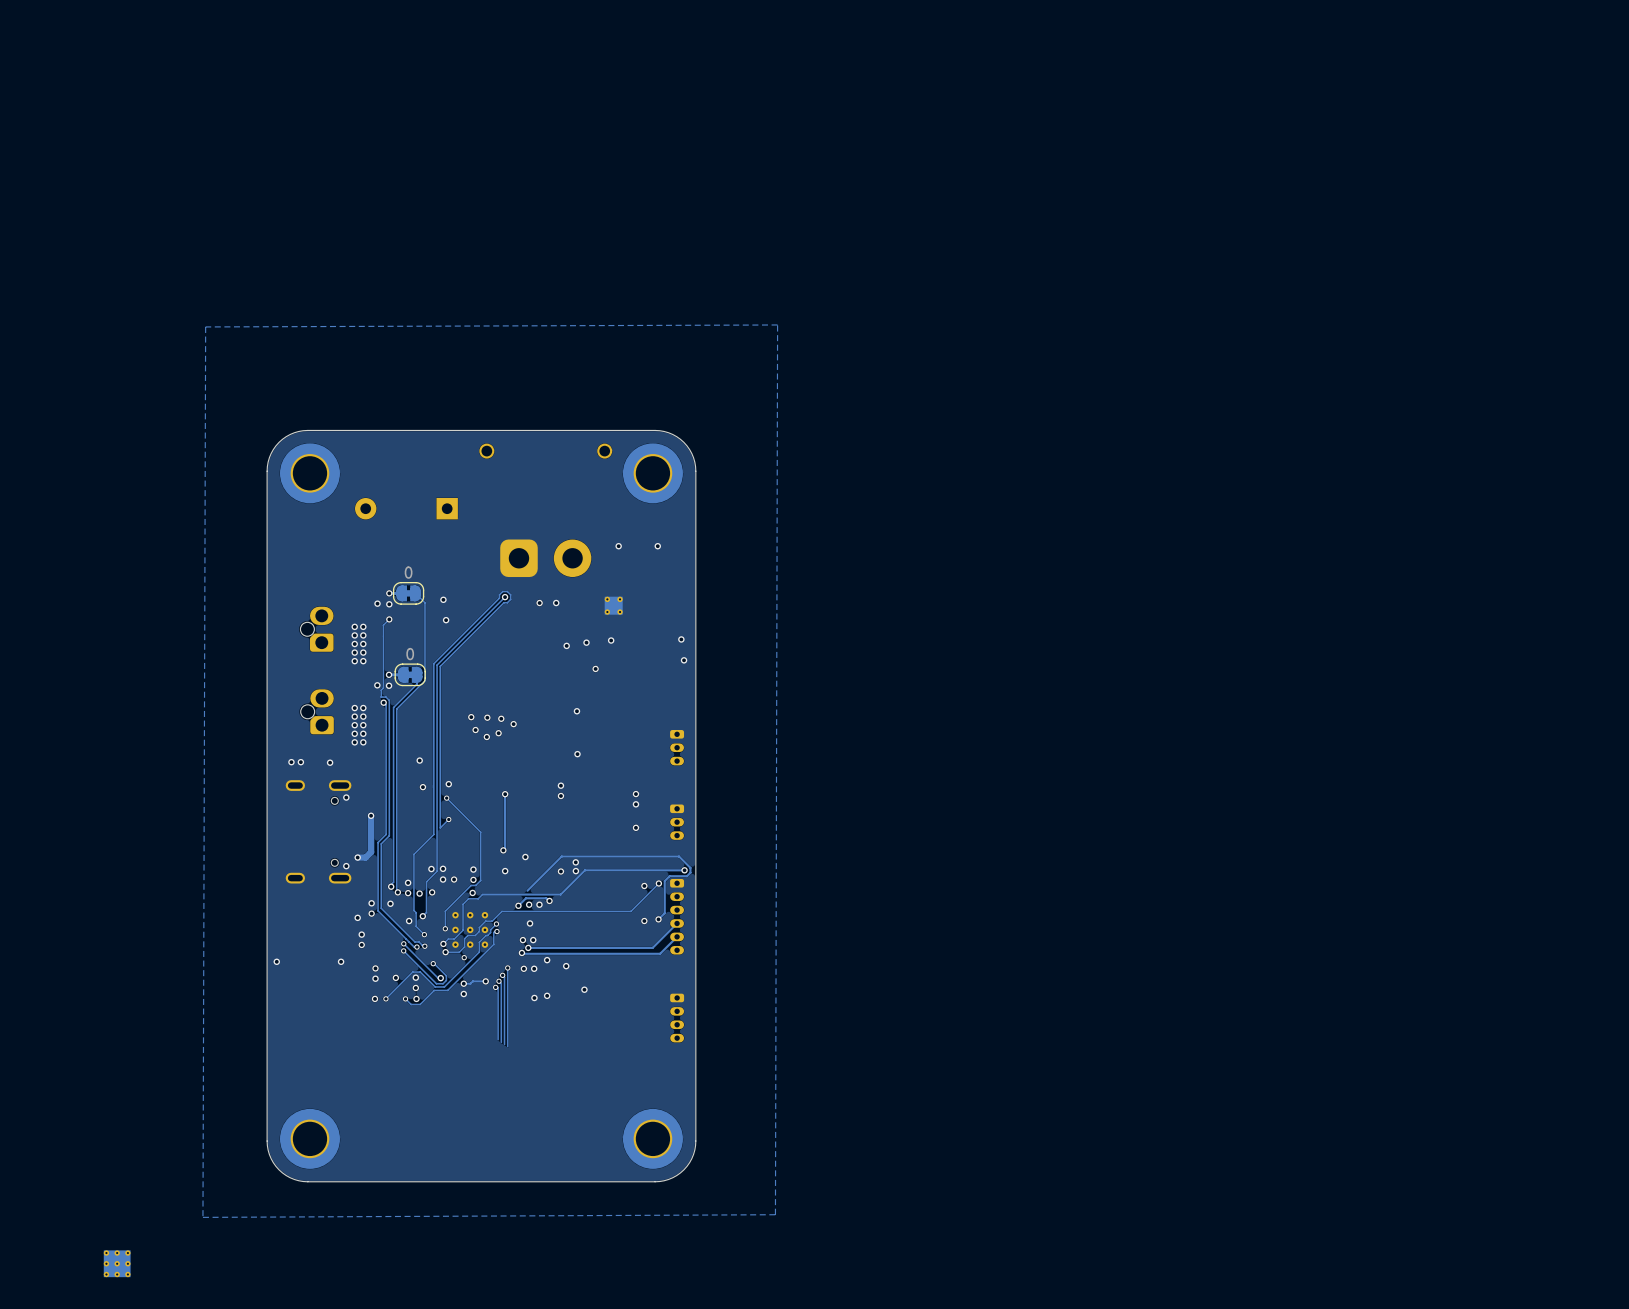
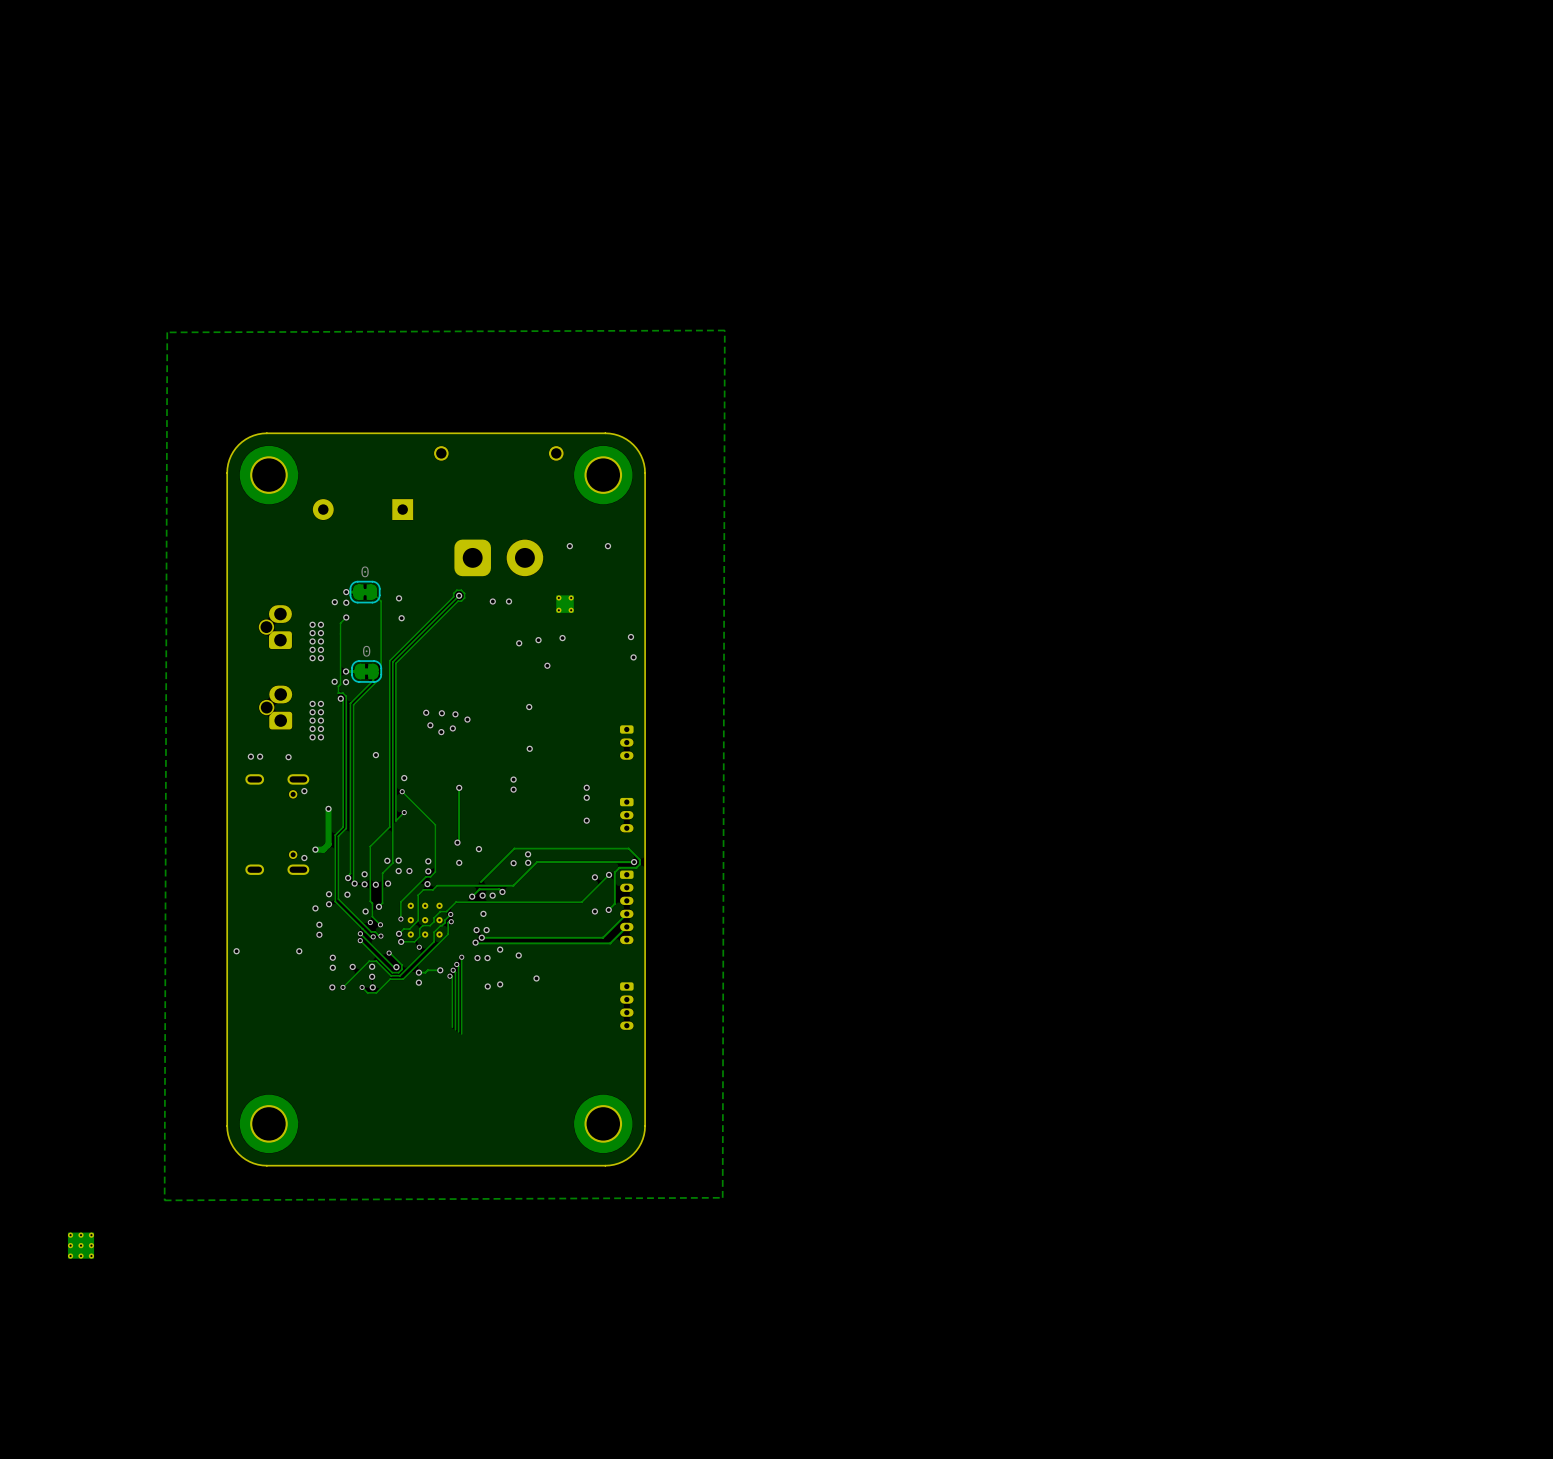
via: (422, 787) -> none
via: none -> (370, 922)

